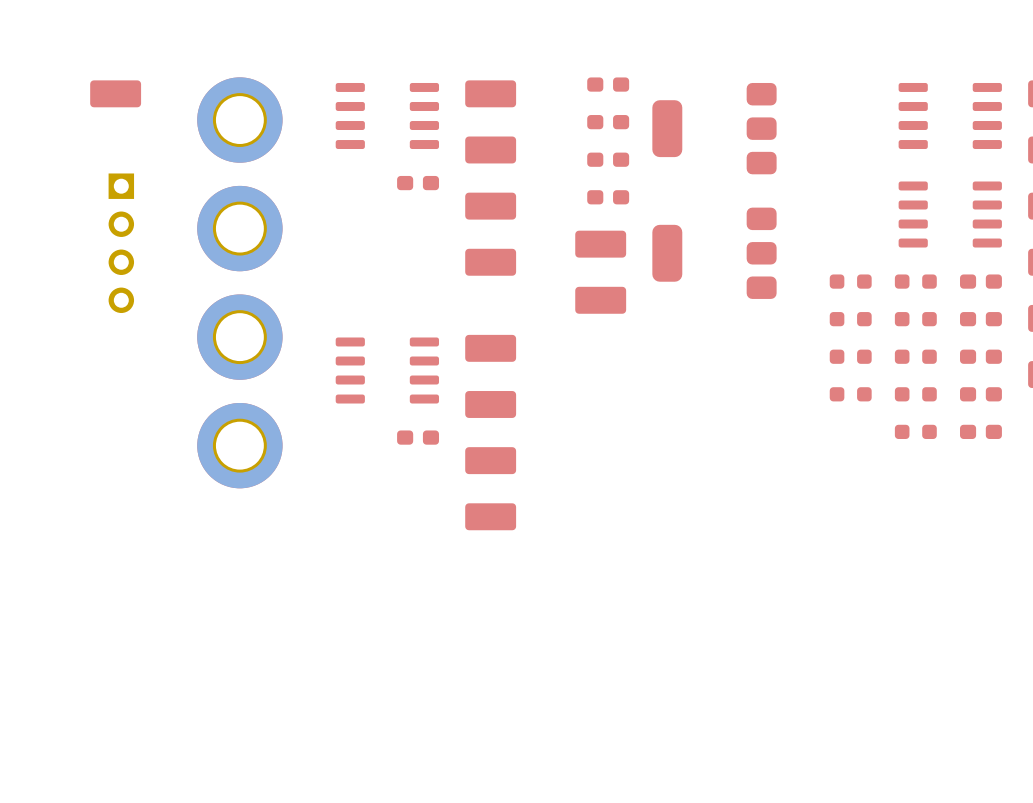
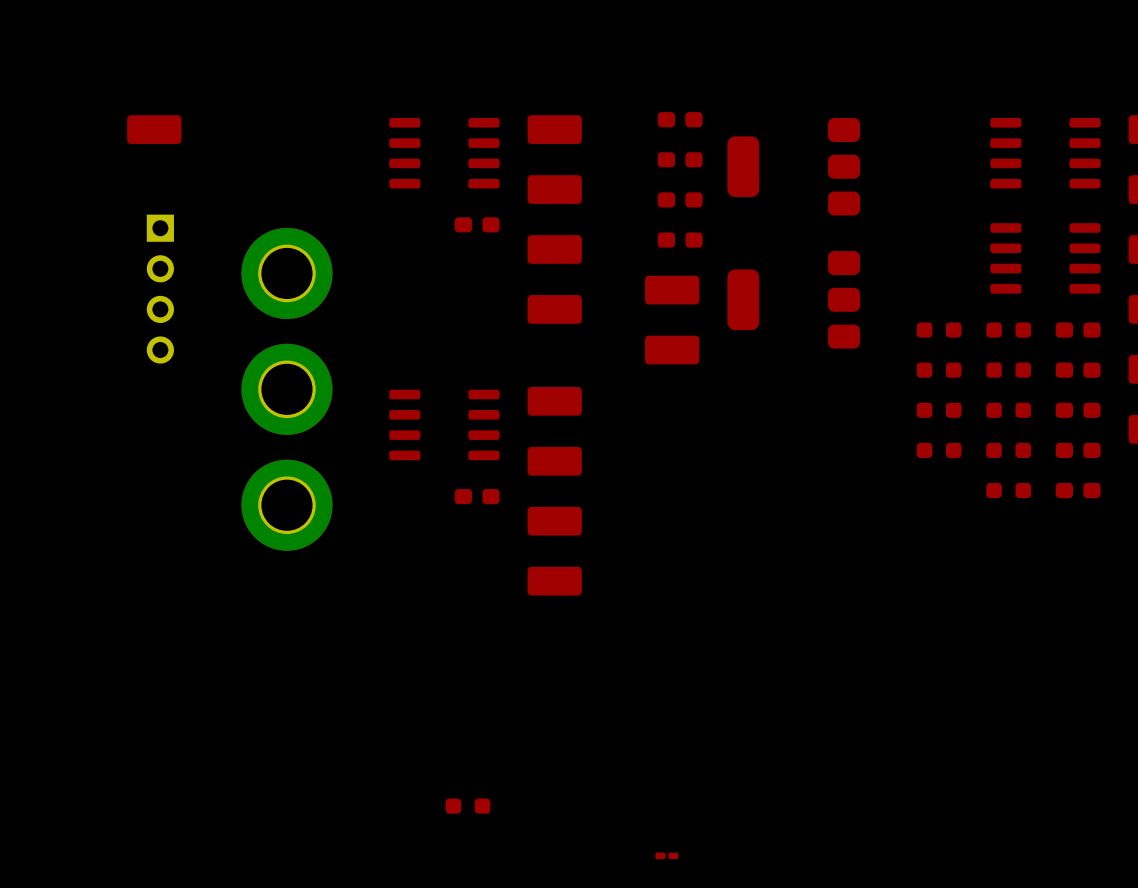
part: (239, 120) -> none
part: none -> (467, 806)
part: none -> (666, 855)

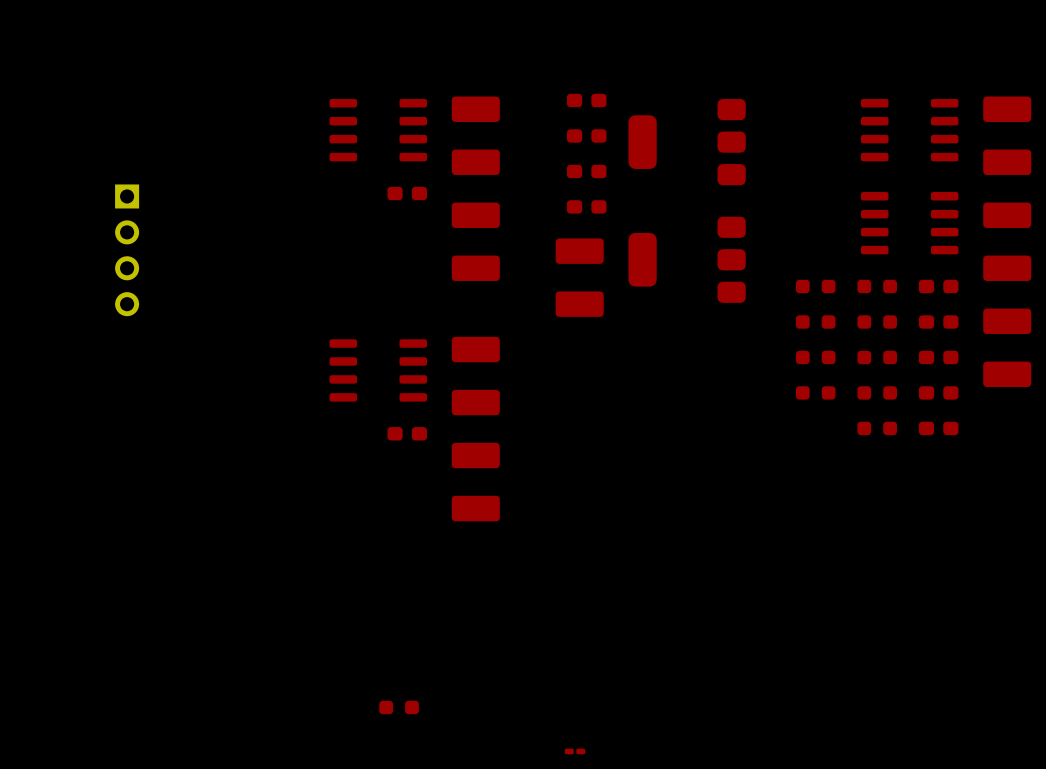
part: (154, 129) -> none
part: (286, 273) -> none
part: (286, 389) -> none
part: (286, 505) -> none

